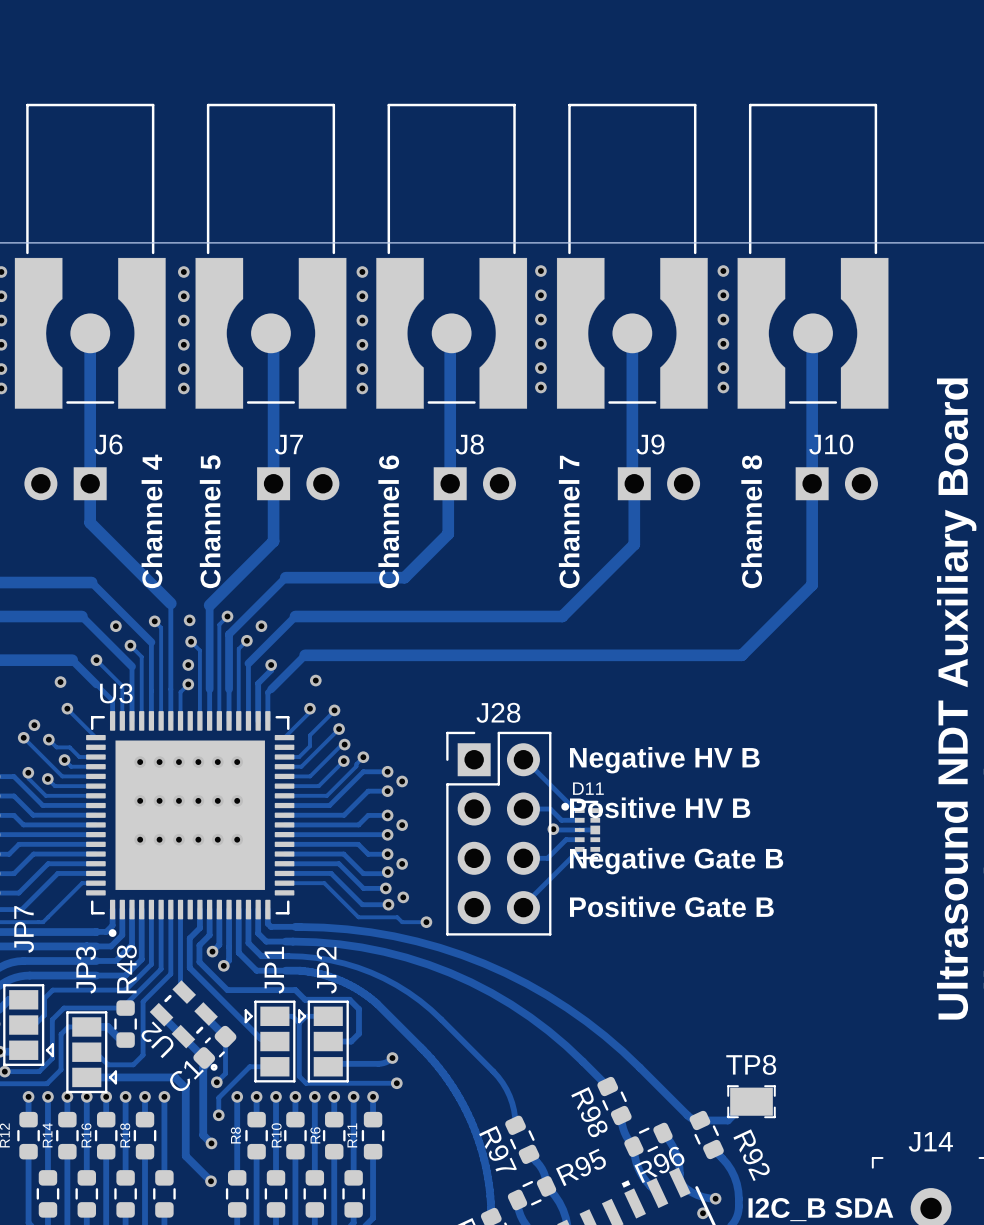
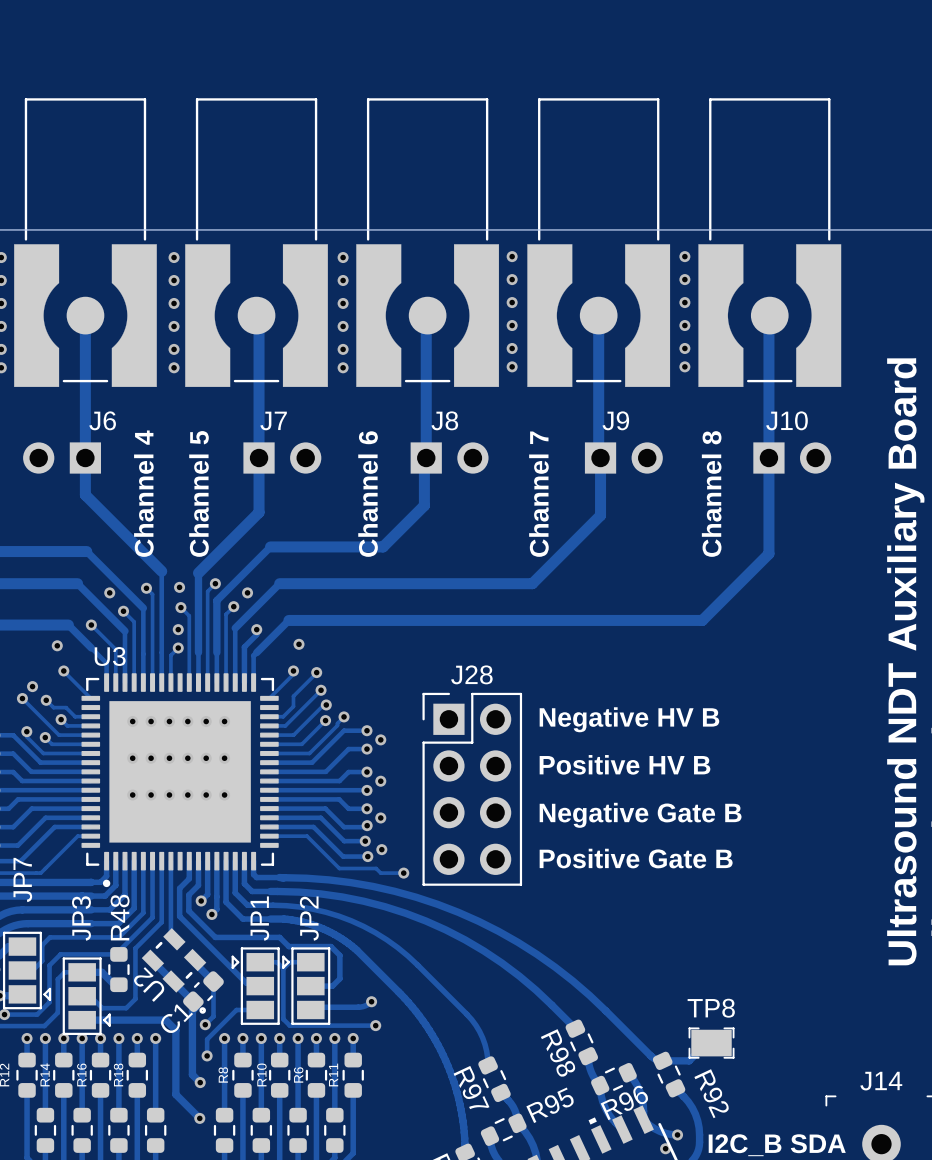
track: (523, 759) (575, 810) (579, 810) -> none
track: (523, 809) (550, 809) (561, 820) (579, 820) -> none
track: (553, 829) (595, 829) -> none
via: (553, 829) -> none
D11: (580, 829) -> none
track: (579, 839) (566, 839) (547, 858) (523, 858) -> none
track: (579, 849) (523, 907) -> none

